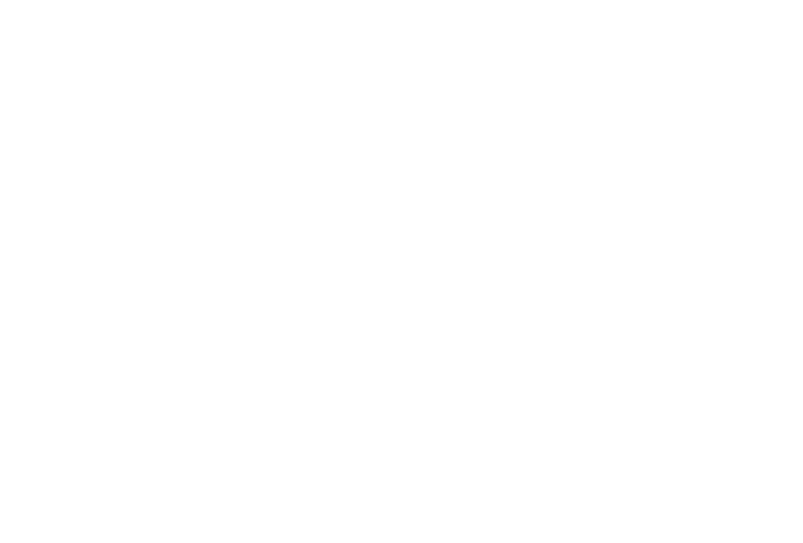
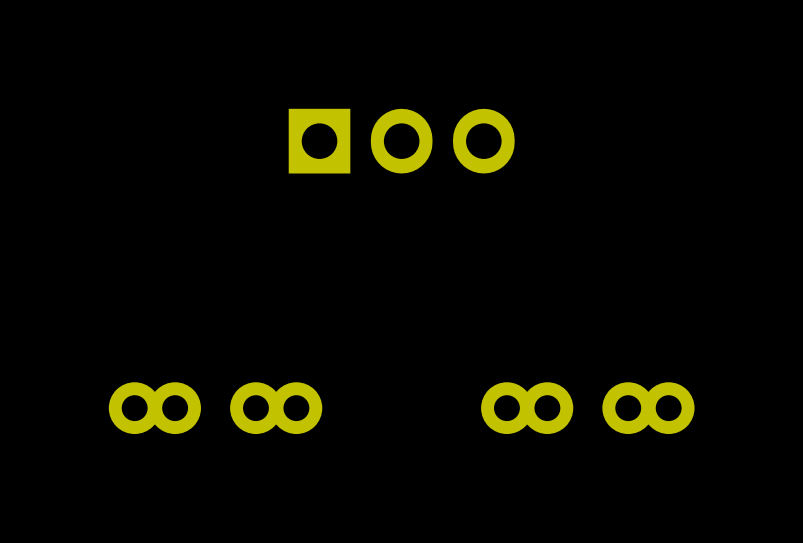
part: none -> (401, 141)
part: none -> (215, 408)
part: none -> (587, 408)

